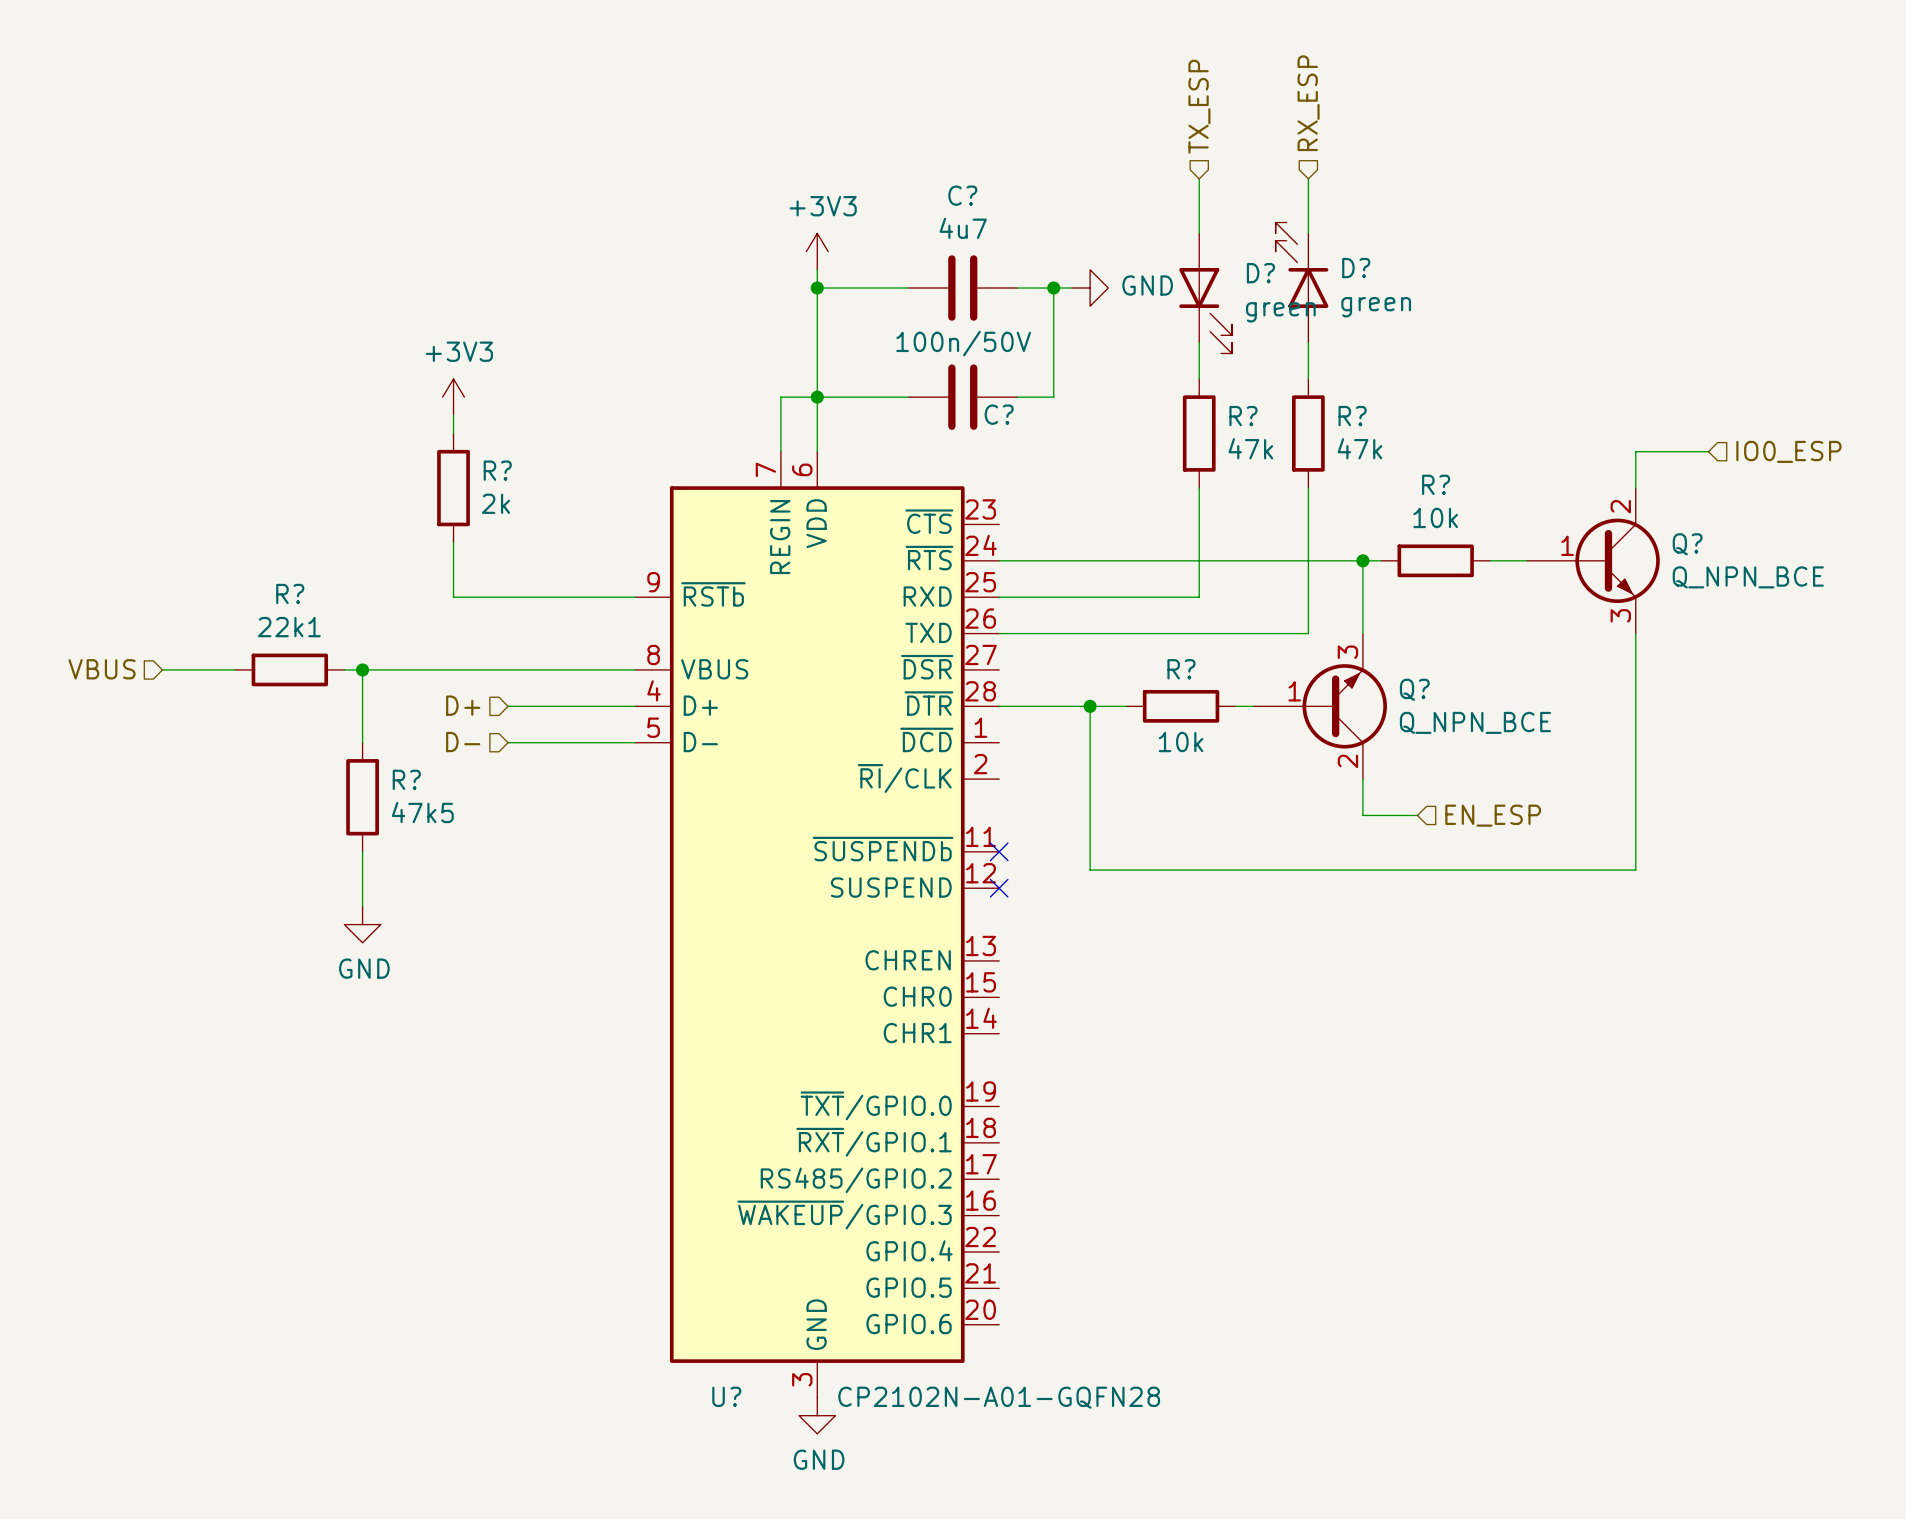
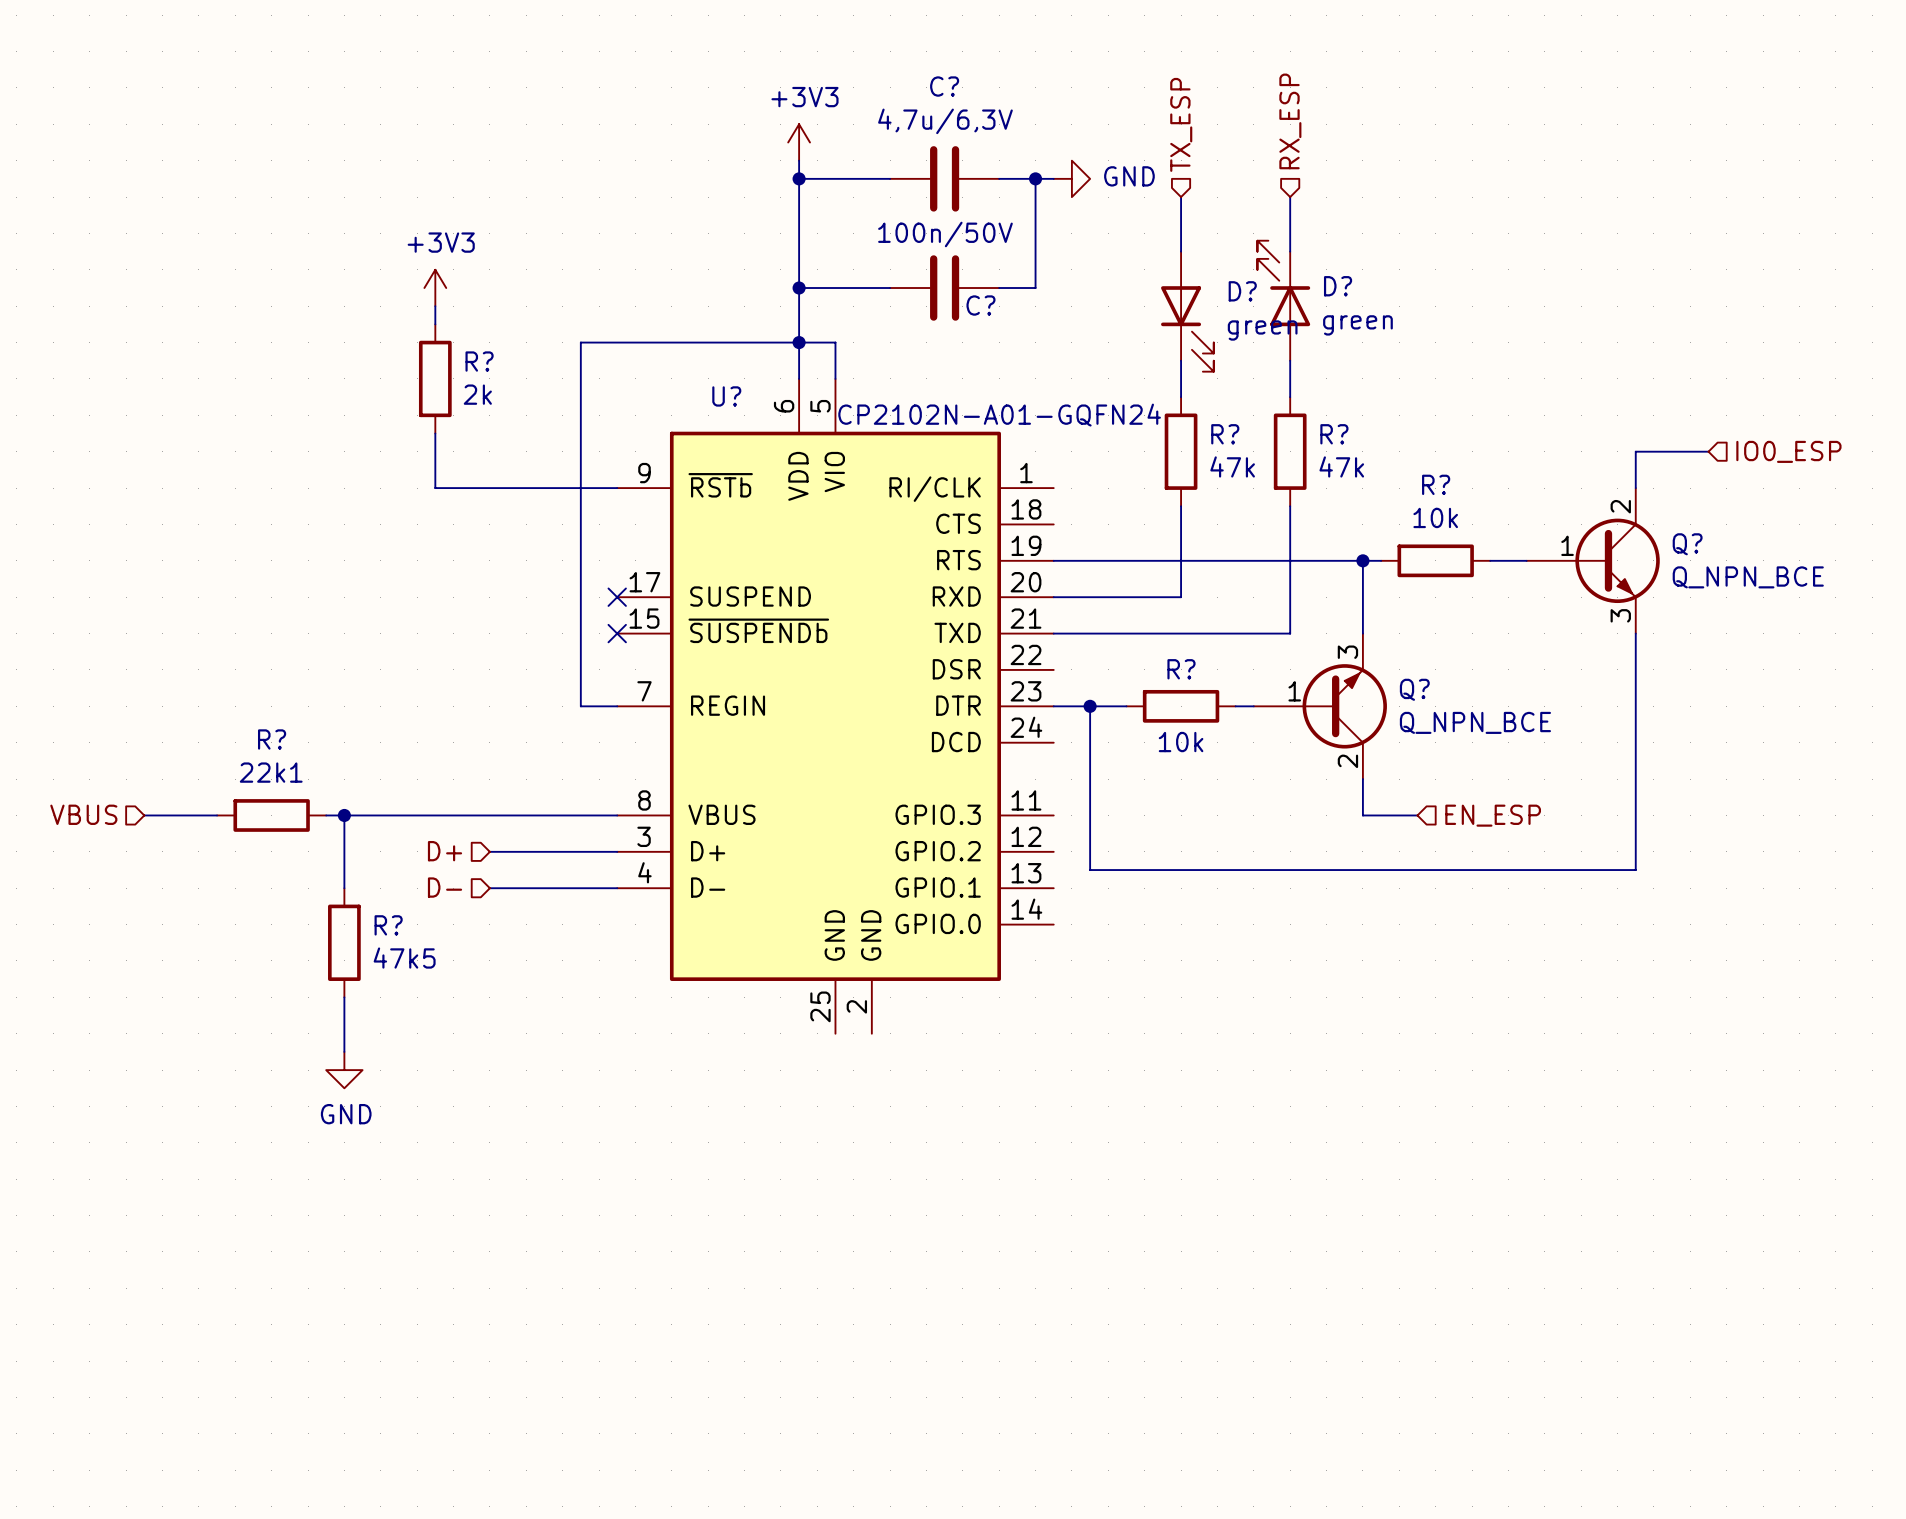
hierarchical label position: RX_ESP (1308, 103) -> RX_ESP (1290, 121)
hierarchical label position: TX_ESP (1199, 106) -> TX_ESP (1181, 124)
wire: none -> (799, 160) (799, 378)
wire: none -> (799, 178) (890, 178)
junction: none -> (799, 178)
C?: none -> 4,7u/6,3V (944, 178)
wire: none -> (999, 178) (1053, 178)
junction: none -> (1035, 178)
wire: (1199, 178) (1199, 233) -> (1181, 197) (1181, 251)
wire: (1308, 178) (1308, 233) -> (1290, 197) (1290, 251)
power symbol position: +3V3 (817, 251) -> +3V3 (799, 142)
wire: (817, 269) (817, 451) -> none
D? position: (1302, 282) -> (1283, 300)
junction position: (817, 288) -> (799, 288)
C?: 4u7 (962, 288) -> none
wire: (1035, 288) (1071, 288) -> (1035, 288) (1035, 178)
wire: (1053, 288) (1053, 397) (1017, 397) -> none
junction: (1053, 288) -> none
power symbol position: GND (1090, 288) -> GND (1071, 178)
D? position: (1205, 293) -> (1187, 311)
junction: none -> (799, 342)
wire: (1199, 342) (1199, 378) -> (1181, 360) (1181, 397)
wire: (1308, 342) (1308, 378) -> (1290, 360) (1290, 397)
power symbol position: +3V3 (453, 397) -> +3V3 (435, 288)
junction: (817, 397) -> none
wire: (908, 397) (780, 397) (780, 451) -> none
C? position: (962, 397) -> (944, 288)
wire: (453, 415) (453, 433) -> (435, 306) (435, 324)
R? position: (1199, 433) -> (1181, 451)
R? position: (1308, 433) -> (1290, 451)
R? position: (453, 488) -> (435, 378)
wire: (1199, 488) (1199, 597) (1181, 597) -> (1181, 506) (1181, 597)
wire: (1308, 488) (1308, 633) (1290, 633) -> (1290, 506) (1290, 633)
wire: (453, 542) (453, 597) (635, 597) -> (435, 433) (435, 488) (617, 488)
no-connect mark: none -> (617, 597)
no-connect mark: none -> (617, 633)
hierarchical label position: VBUS (102, 669) -> VBUS (83, 814)
wire: (162, 669) (235, 669) -> (144, 815) (217, 815)
R? position: (289, 669) -> (271, 815)
wire: (344, 669) (635, 669) -> (326, 815) (617, 815)
wire: (362, 669) (362, 742) -> (344, 815) (344, 888)
junction: (362, 669) -> none
hierarchical label position: D+ (463, 705) -> D+ (445, 851)
wire: (508, 706) (580, 706) -> (835, 378) (835, 342) (580, 342) (580, 706)
U?: none -> CP2102N-A01-GQFN24 (835, 706)
hierarchical label position: D- (463, 742) -> D- (445, 887)
wire: (508, 742) (635, 742) -> (489, 888) (617, 888)
R? position: (362, 797) -> (344, 942)
junction: none -> (344, 815)
wire: (362, 851) (362, 906) -> (344, 997) (344, 1051)
wire: none -> (489, 851) (617, 851)
no-connect mark: (999, 851) -> none
no-connect mark: (999, 888) -> none
power symbol position: GND (362, 924) -> GND (344, 1070)
U?: CP2102N-A01-GQFN28 (817, 924) -> none
power symbol: GND (817, 1415) -> none

